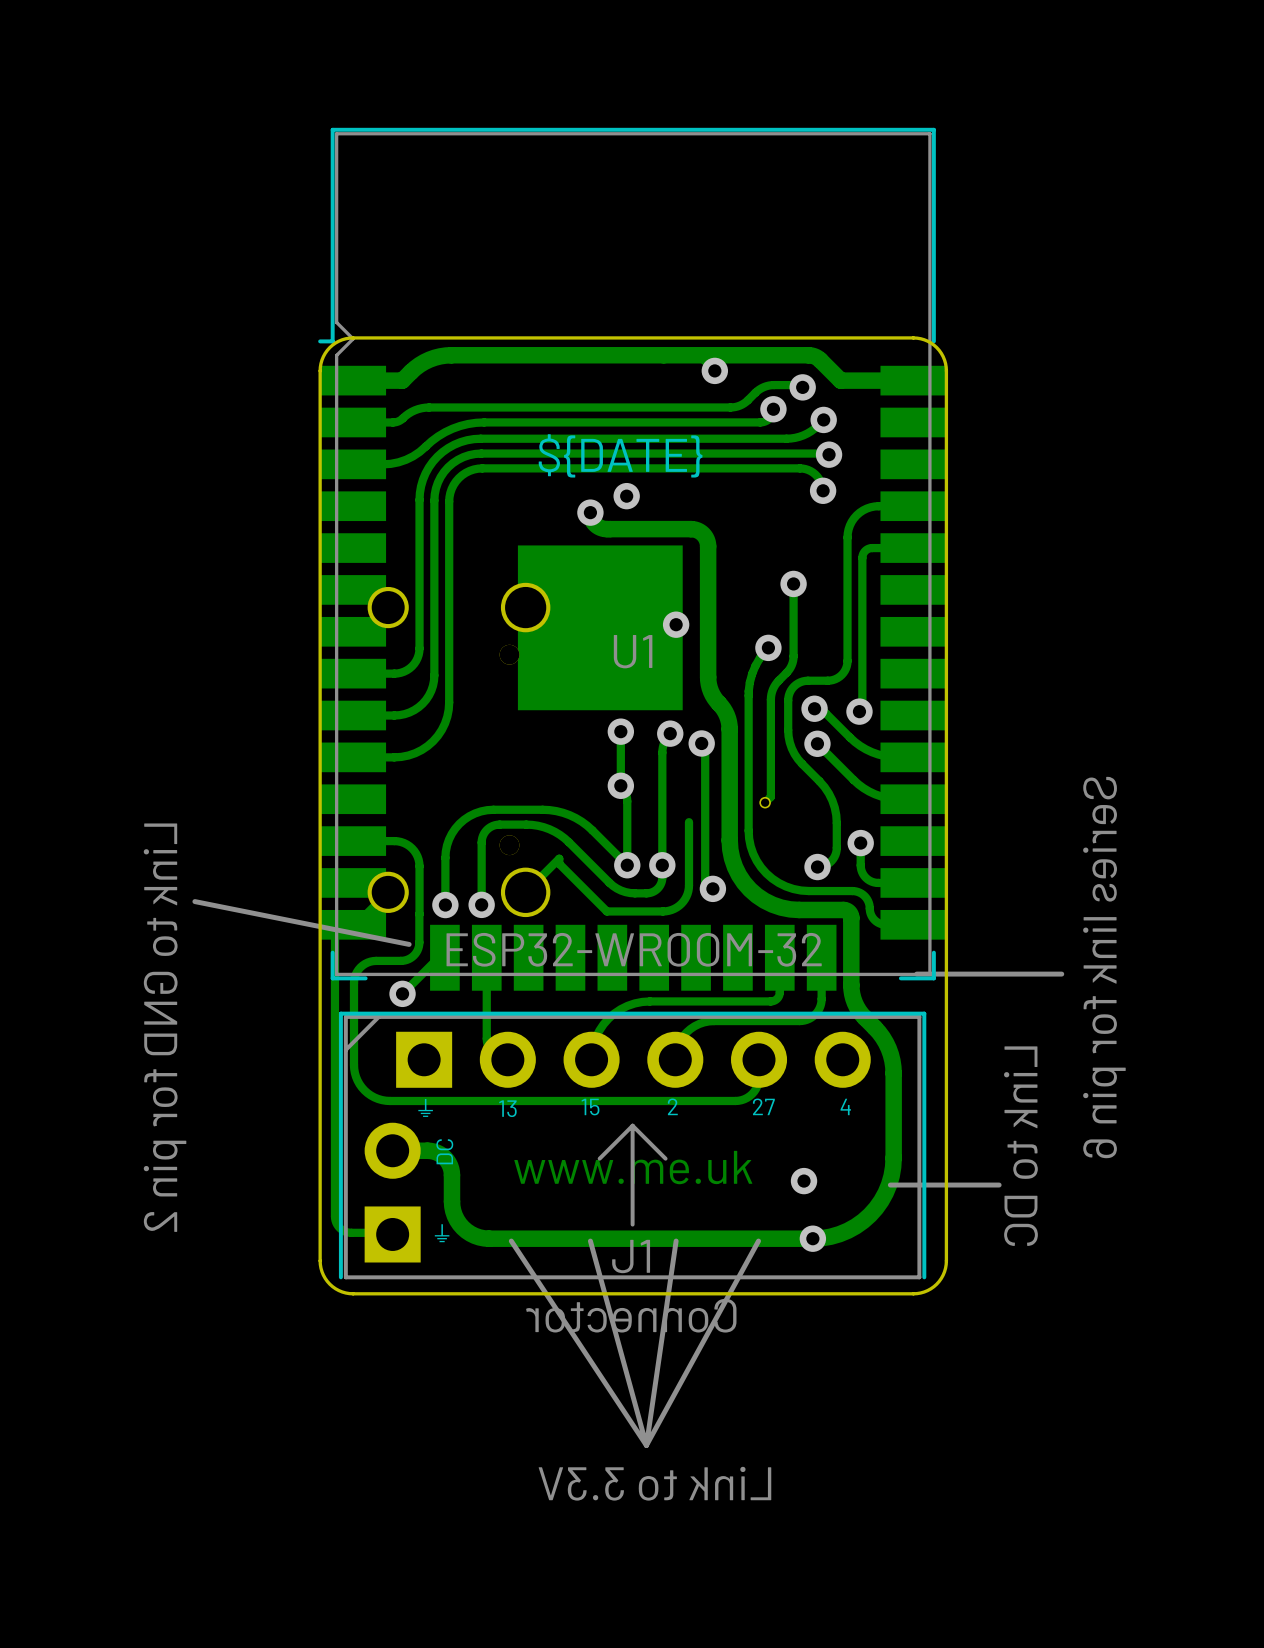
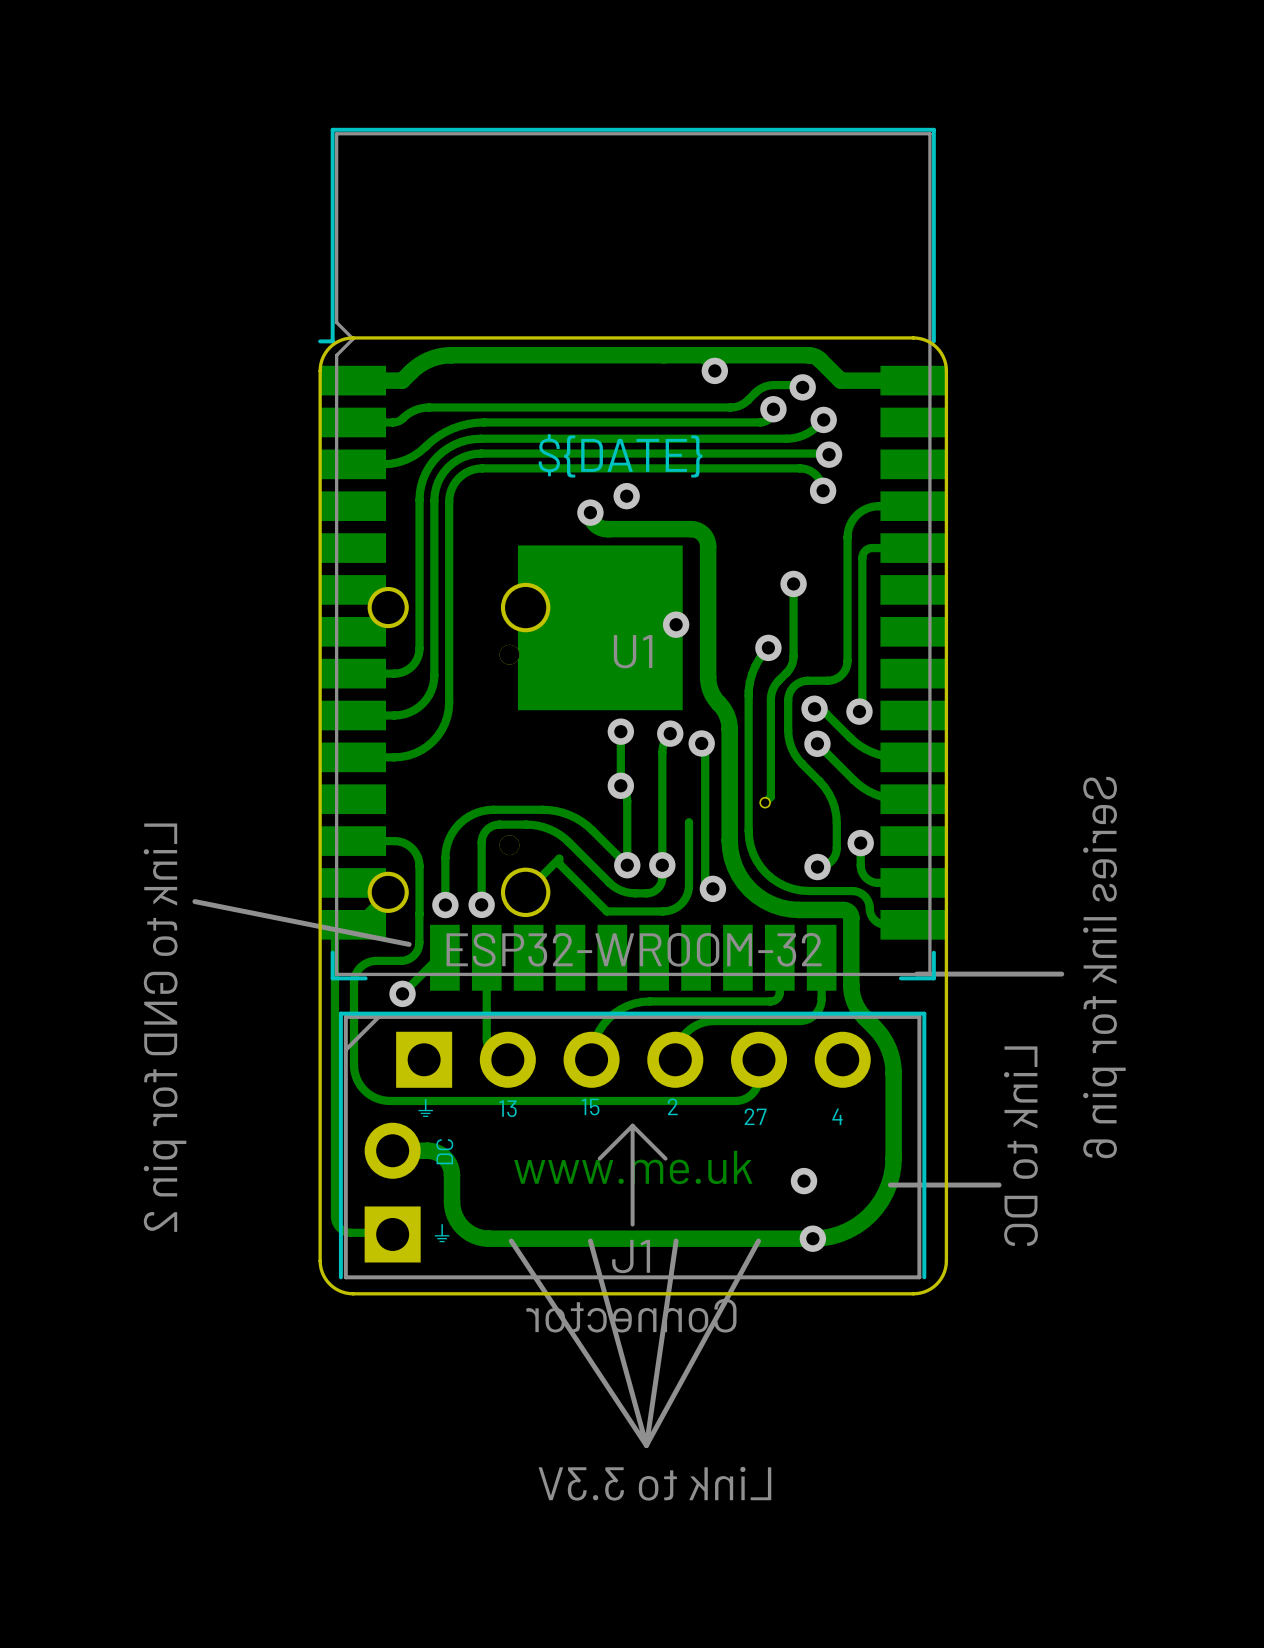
text position: 27 (763, 1106) -> 27 (755, 1116)
text position: 4 (845, 1106) -> 4 (837, 1116)

